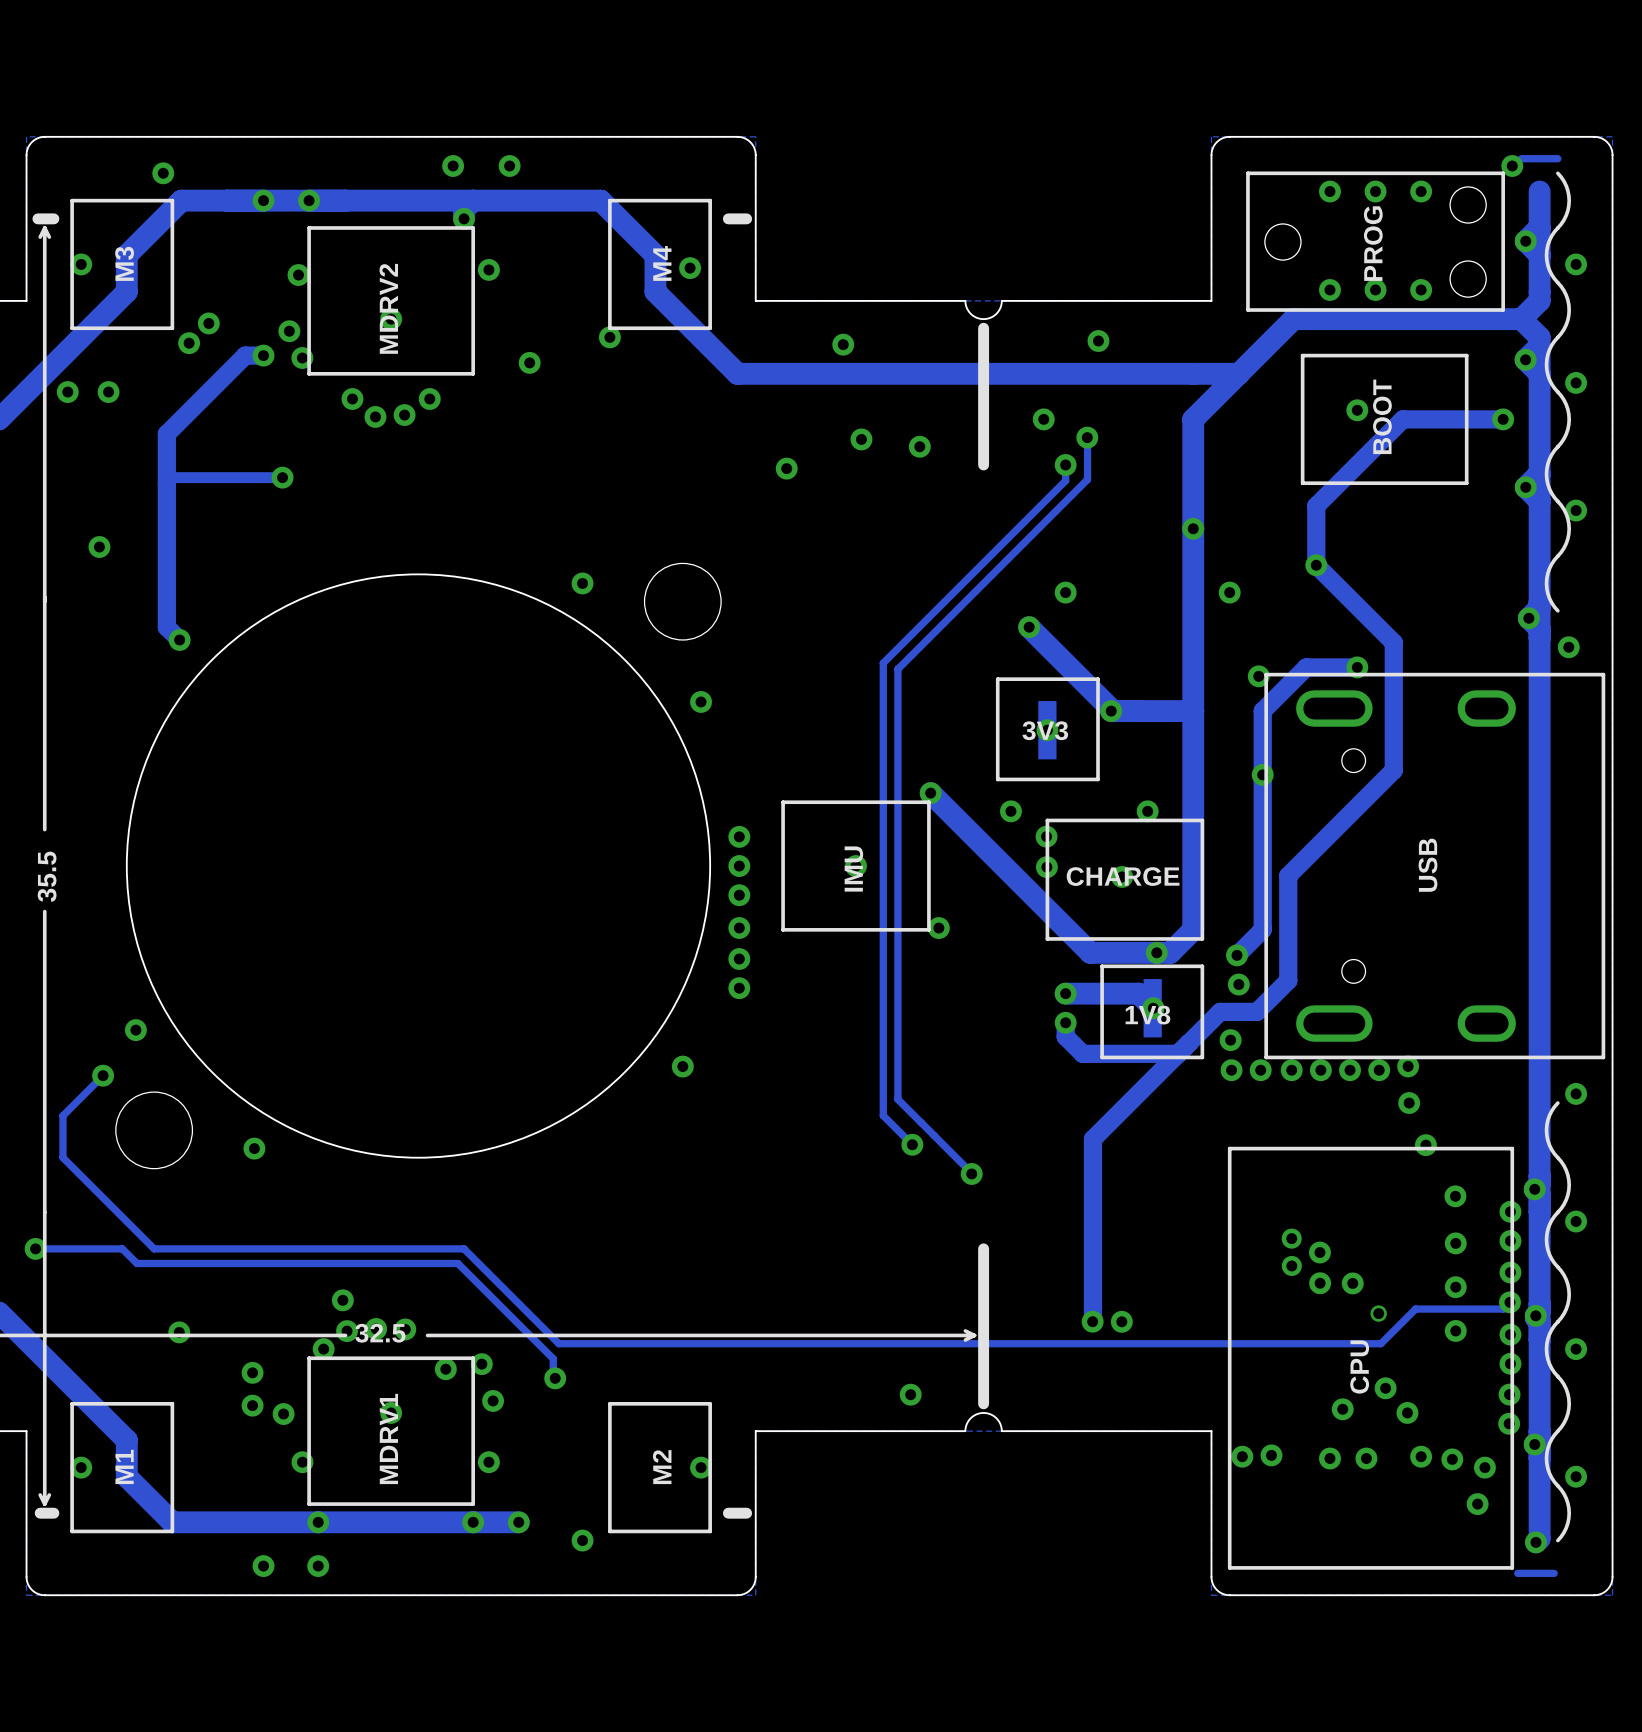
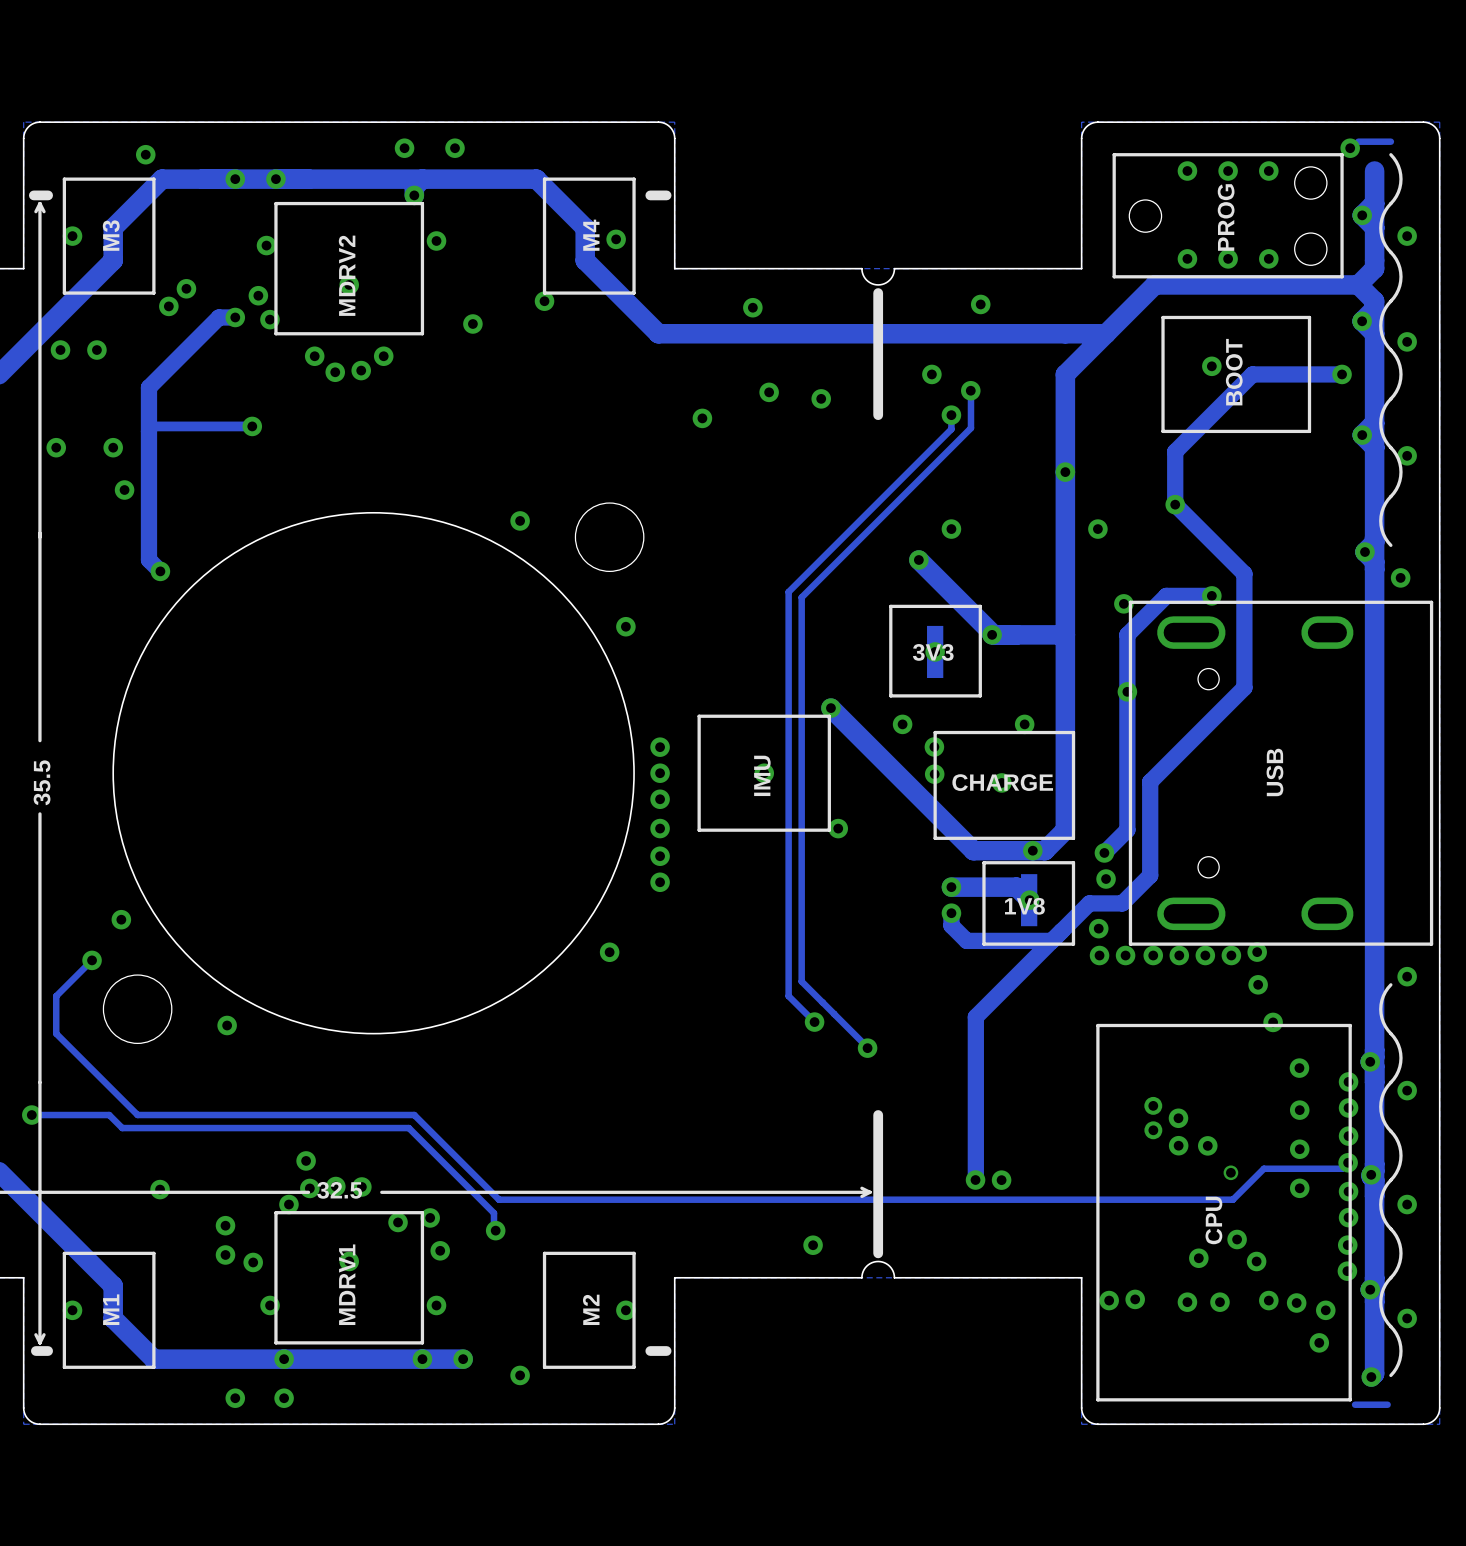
via: none -> (56, 447)
via: none -> (113, 447)
via: (99, 547) -> none
via: none -> (124, 490)

